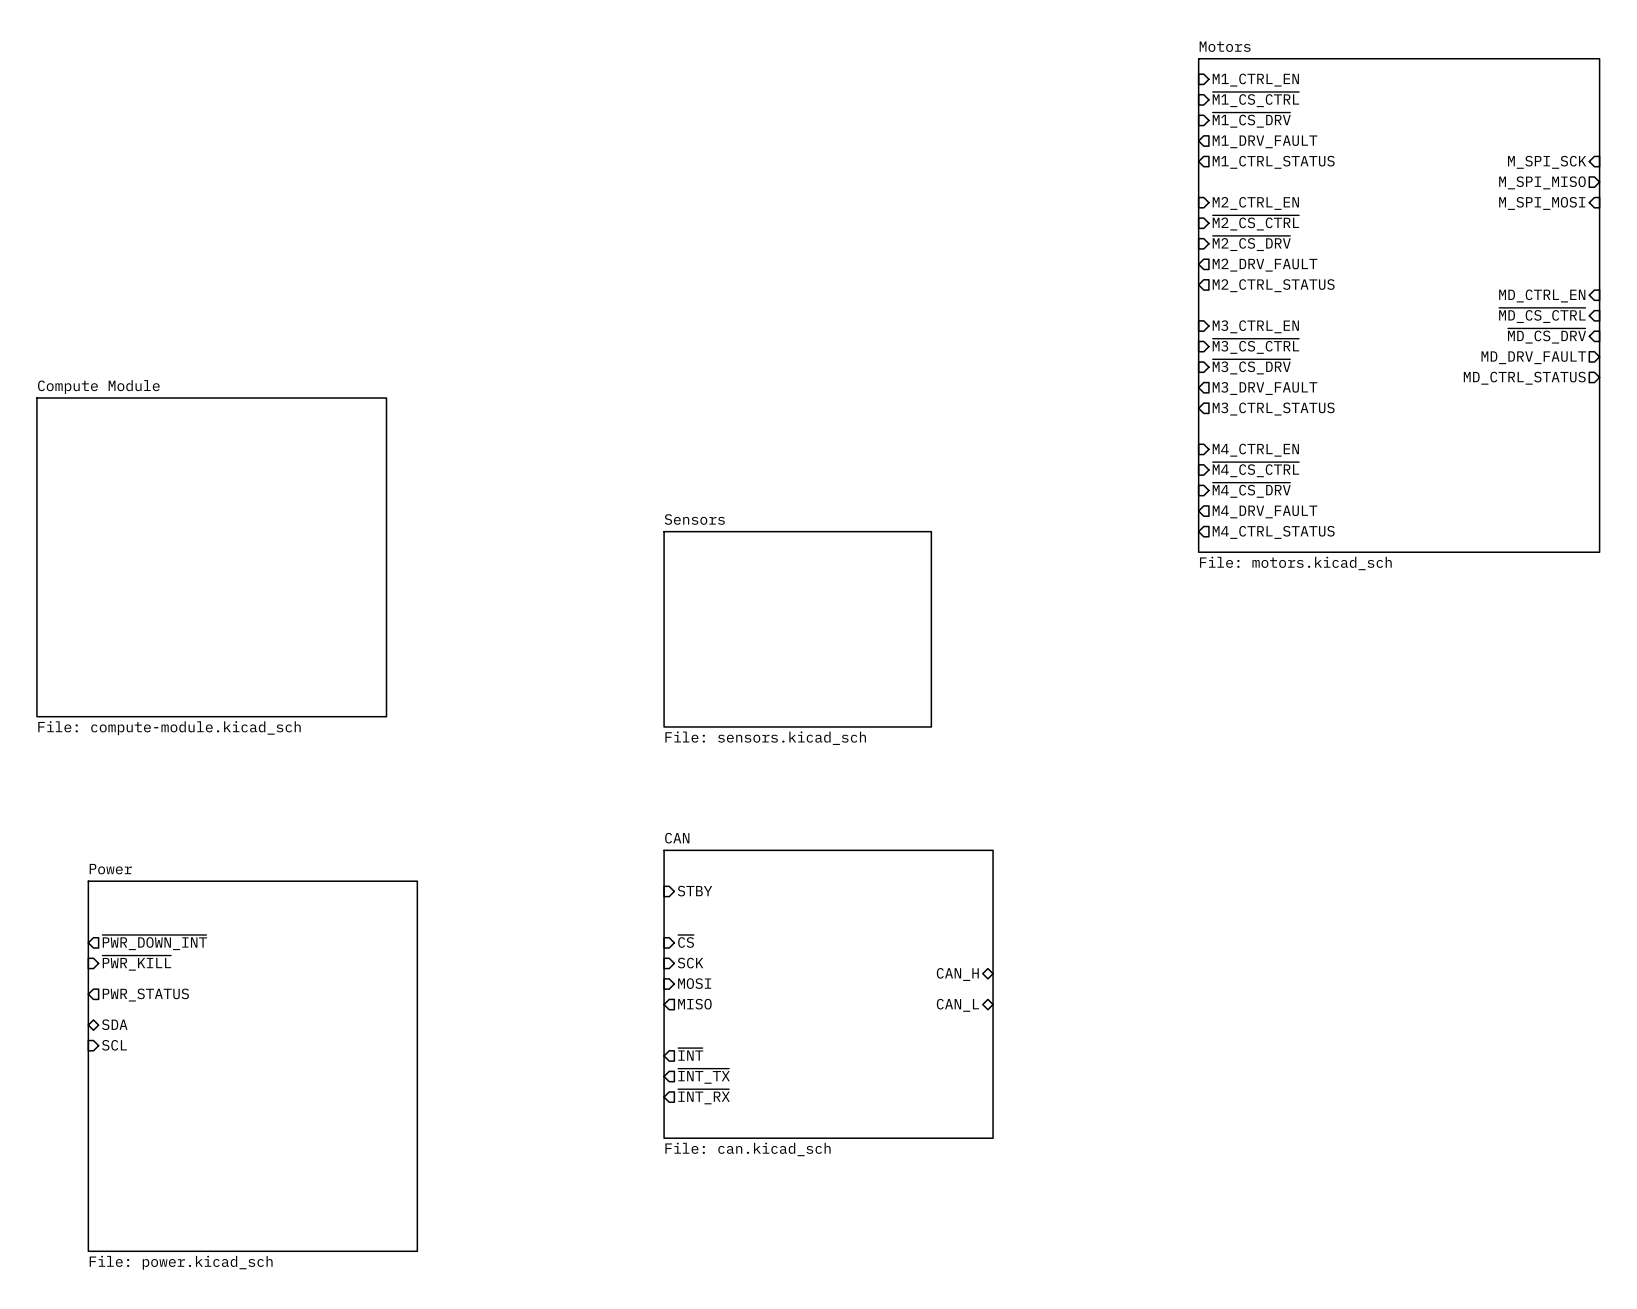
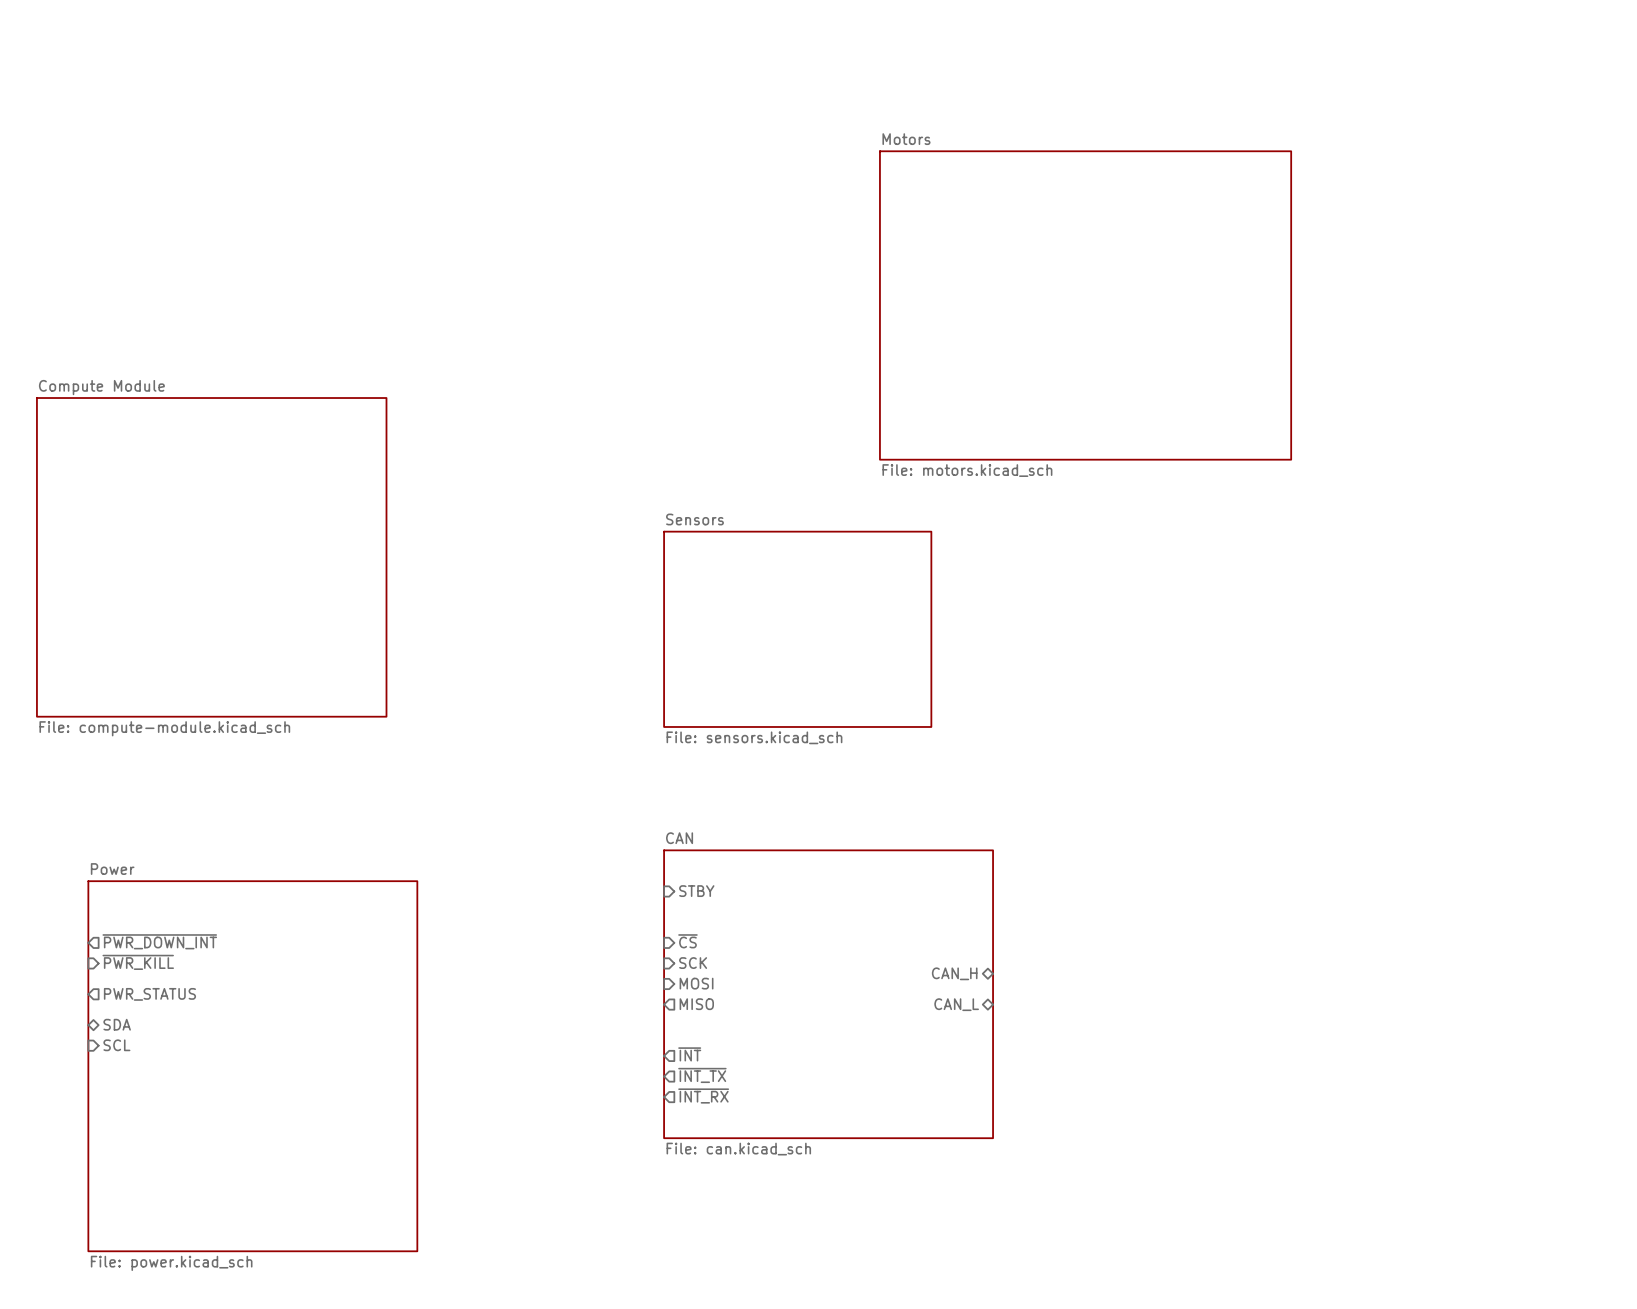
sheet pin: M1_CTRL_EN (1255, 80) -> none
sheet pin: ~{M1_CS_CTRL} (1255, 99) -> none
sheet pin: ~{M1_CS_DRV} (1251, 120) -> none
sheet pin: M1_DRV_FAULT (1265, 141) -> none
sheet pin: M1_CTRL_STATUS (1273, 162) -> none
sheet pin: M_SPI_SCK (1547, 162) -> none
sheet pin: M_SPI_MISO (1542, 182) -> none
sheet pin: M2_CTRL_EN (1255, 203) -> none
sheet pin: M_SPI_MOSI (1542, 203) -> none
sheet pin: ~{M2_CS_CTRL} (1255, 222) -> none
sheet pin: ~{M2_CS_DRV} (1251, 243) -> none
sheet pin: M2_DRV_FAULT (1265, 265) -> none
sheet pin: M2_CTRL_STATUS (1273, 285) -> none
sheet pin: MD_CTRL_EN (1542, 295) -> none
sheet Motors: none -> File: motors.kicad_sch (1085, 305)
sheet Motors: File: motors.kicad_sch (1399, 305) -> none
sheet pin: ~{MD_CS_CTRL} (1542, 315) -> none
sheet pin: M3_CTRL_EN (1255, 326) -> none
sheet pin: ~{MD_CS_DRV} (1547, 336) -> none
sheet pin: ~{M3_CS_CTRL} (1255, 346) -> none
sheet pin: MD_DRV_FAULT (1533, 357) -> none
sheet pin: ~{M3_CS_DRV} (1251, 366) -> none
sheet pin: MD_CTRL_STATUS (1524, 378) -> none
sheet pin: M3_DRV_FAULT (1265, 388) -> none
sheet pin: M3_CTRL_STATUS (1273, 409) -> none
sheet pin: M4_CTRL_EN (1255, 450) -> none
sheet pin: ~{M4_CS_CTRL} (1255, 469) -> none
sheet pin: ~{M4_CS_DRV} (1251, 490) -> none
sheet pin: M4_DRV_FAULT (1265, 511) -> none
sheet pin: M4_CTRL_STATUS (1273, 532) -> none

